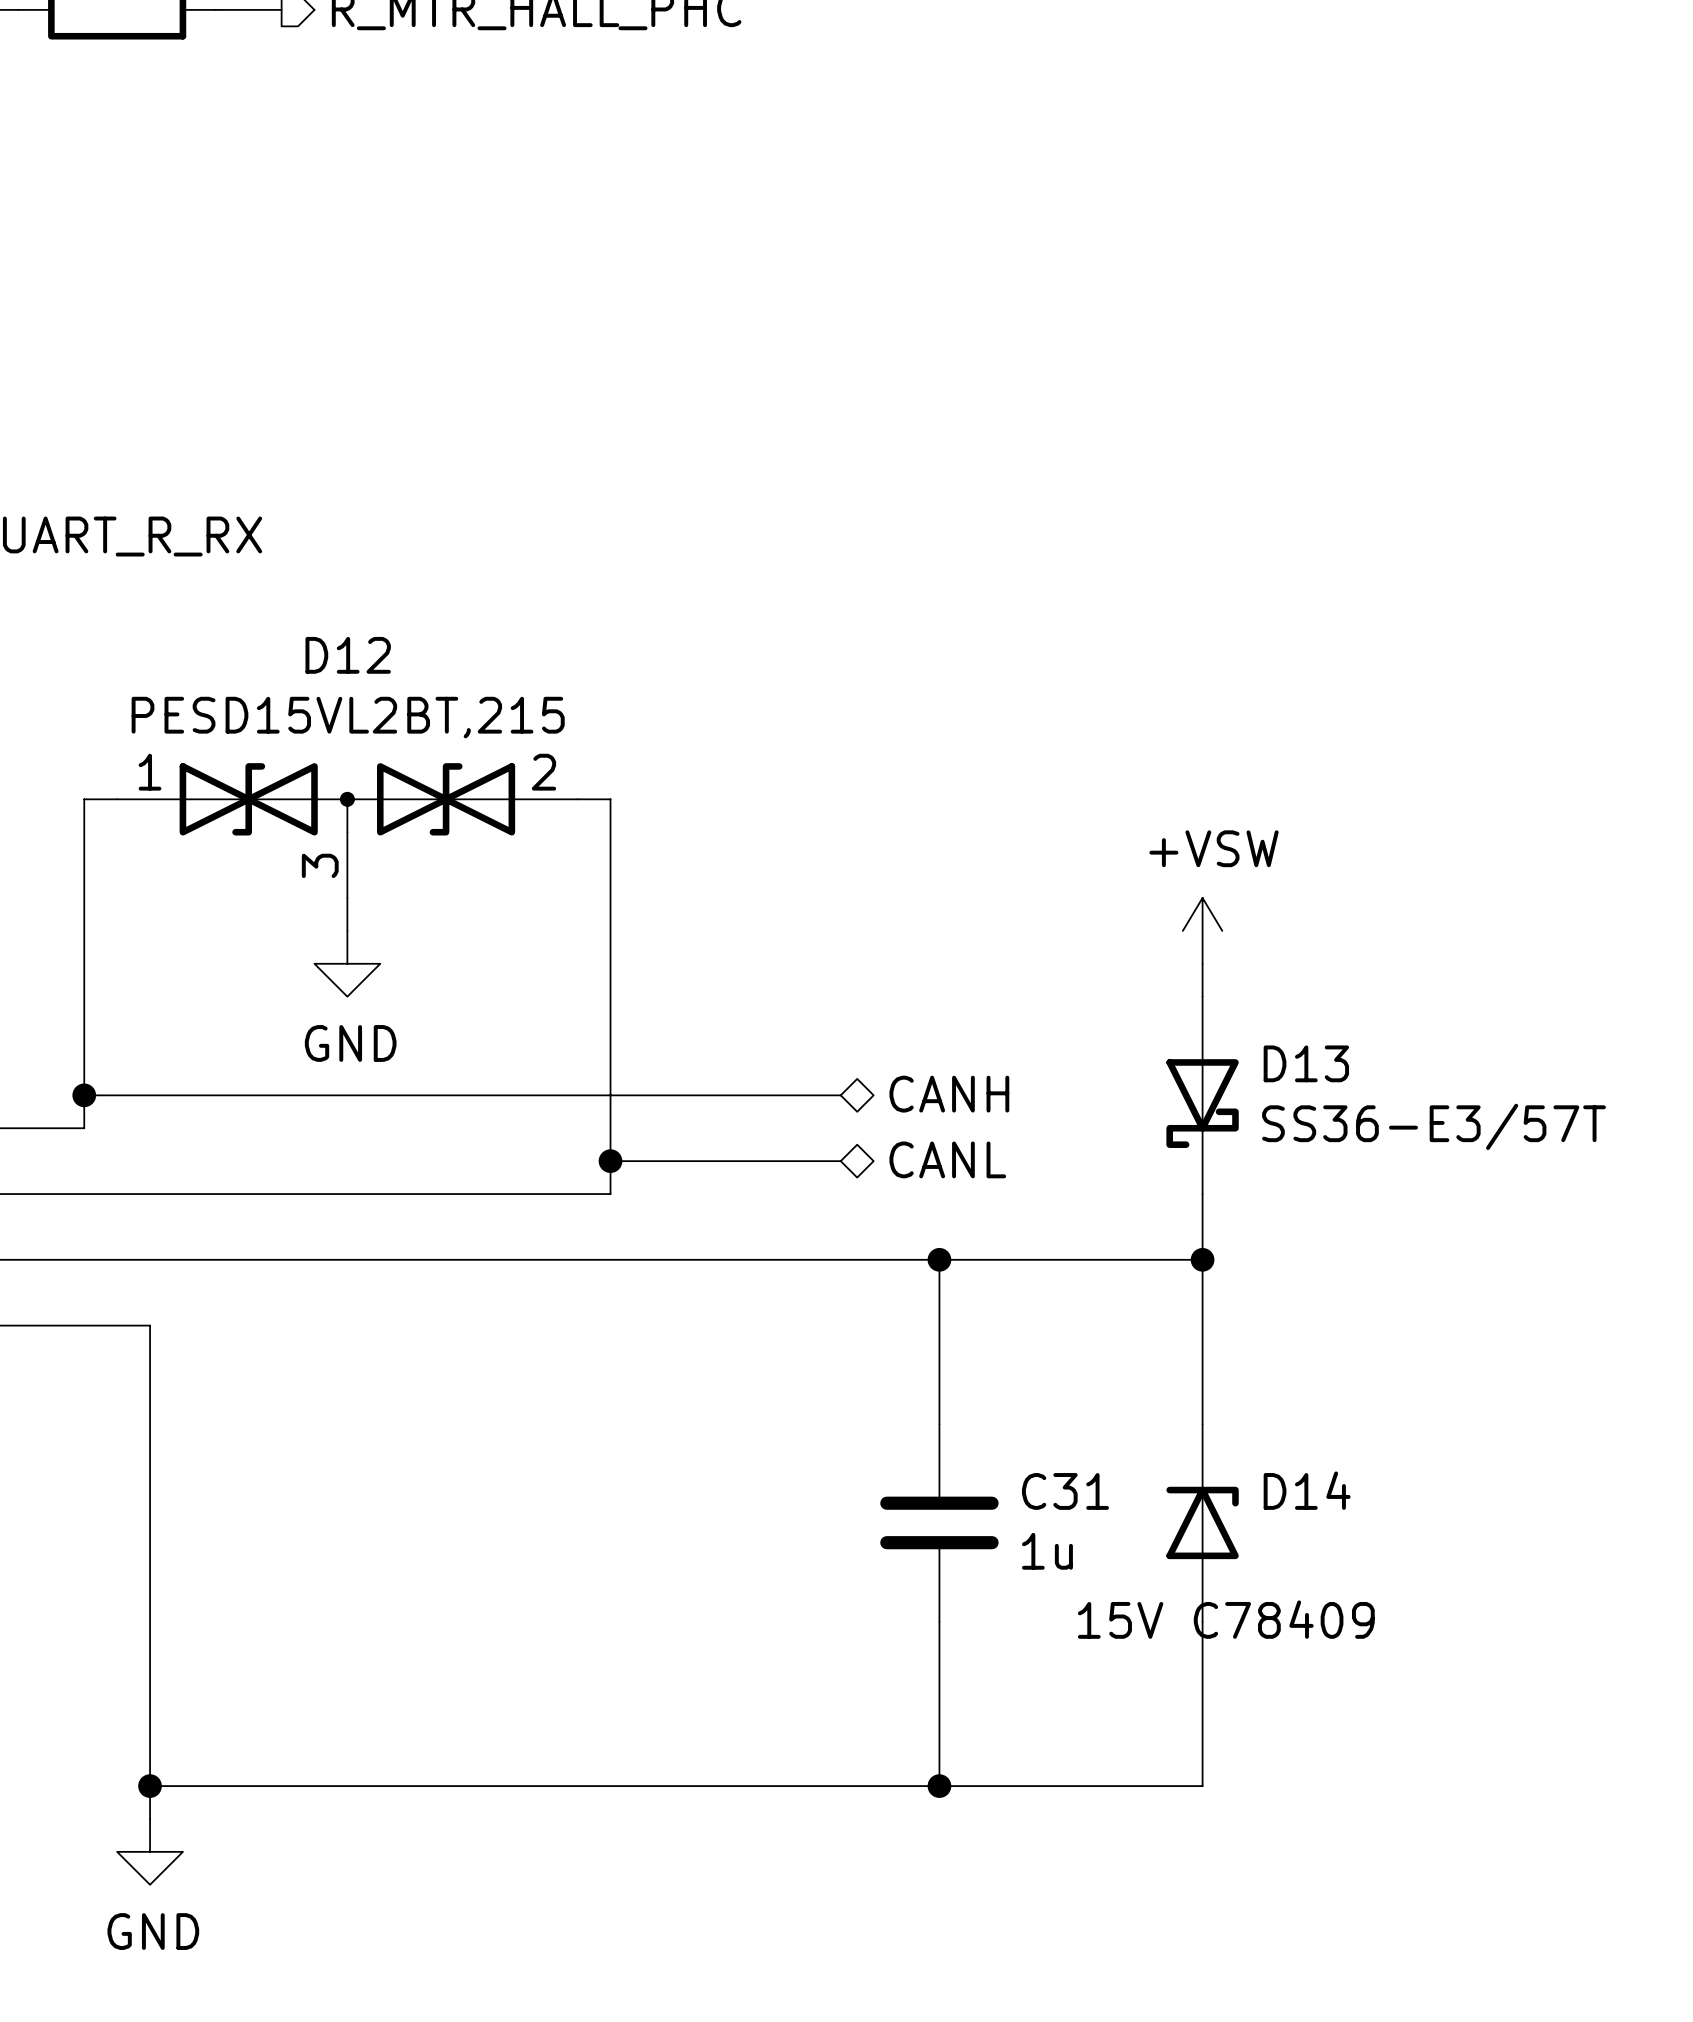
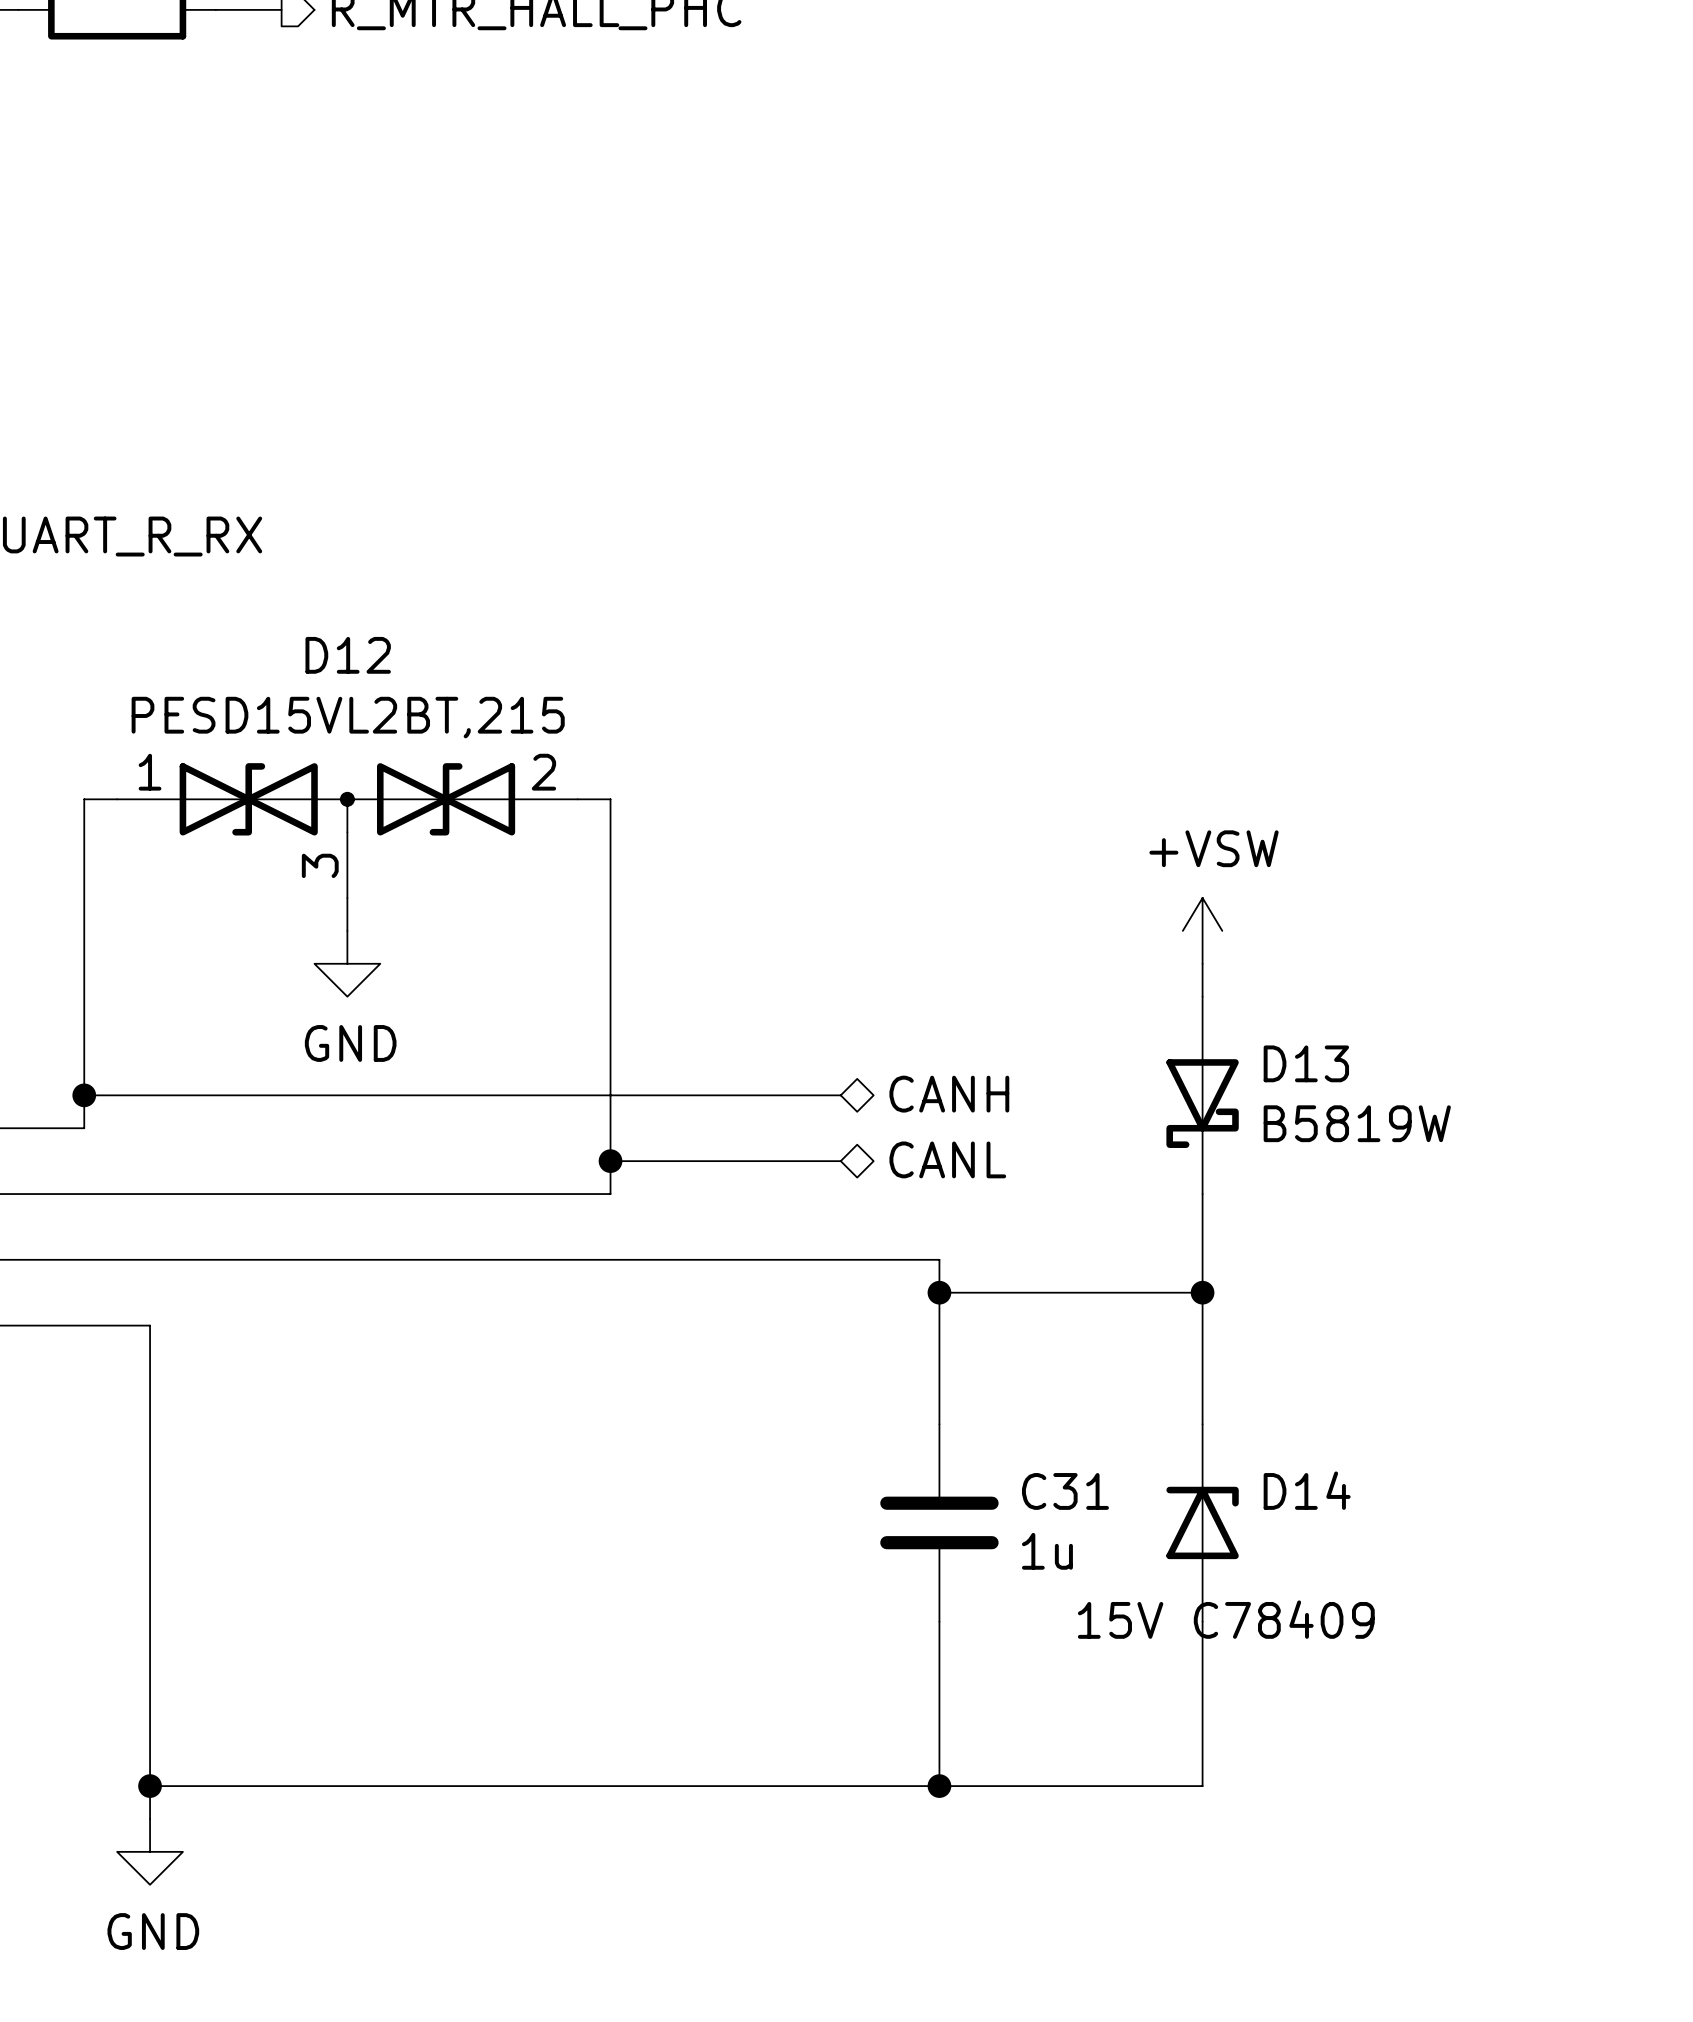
D13 value: SS36-E3/57T (1434, 1126) -> B5819W (1357, 1123)
wire: (939, 1259) (1202, 1259) -> (939, 1292) (1202, 1292)
junction position: (939, 1259) -> (939, 1292)
junction position: (1202, 1259) -> (1202, 1292)

